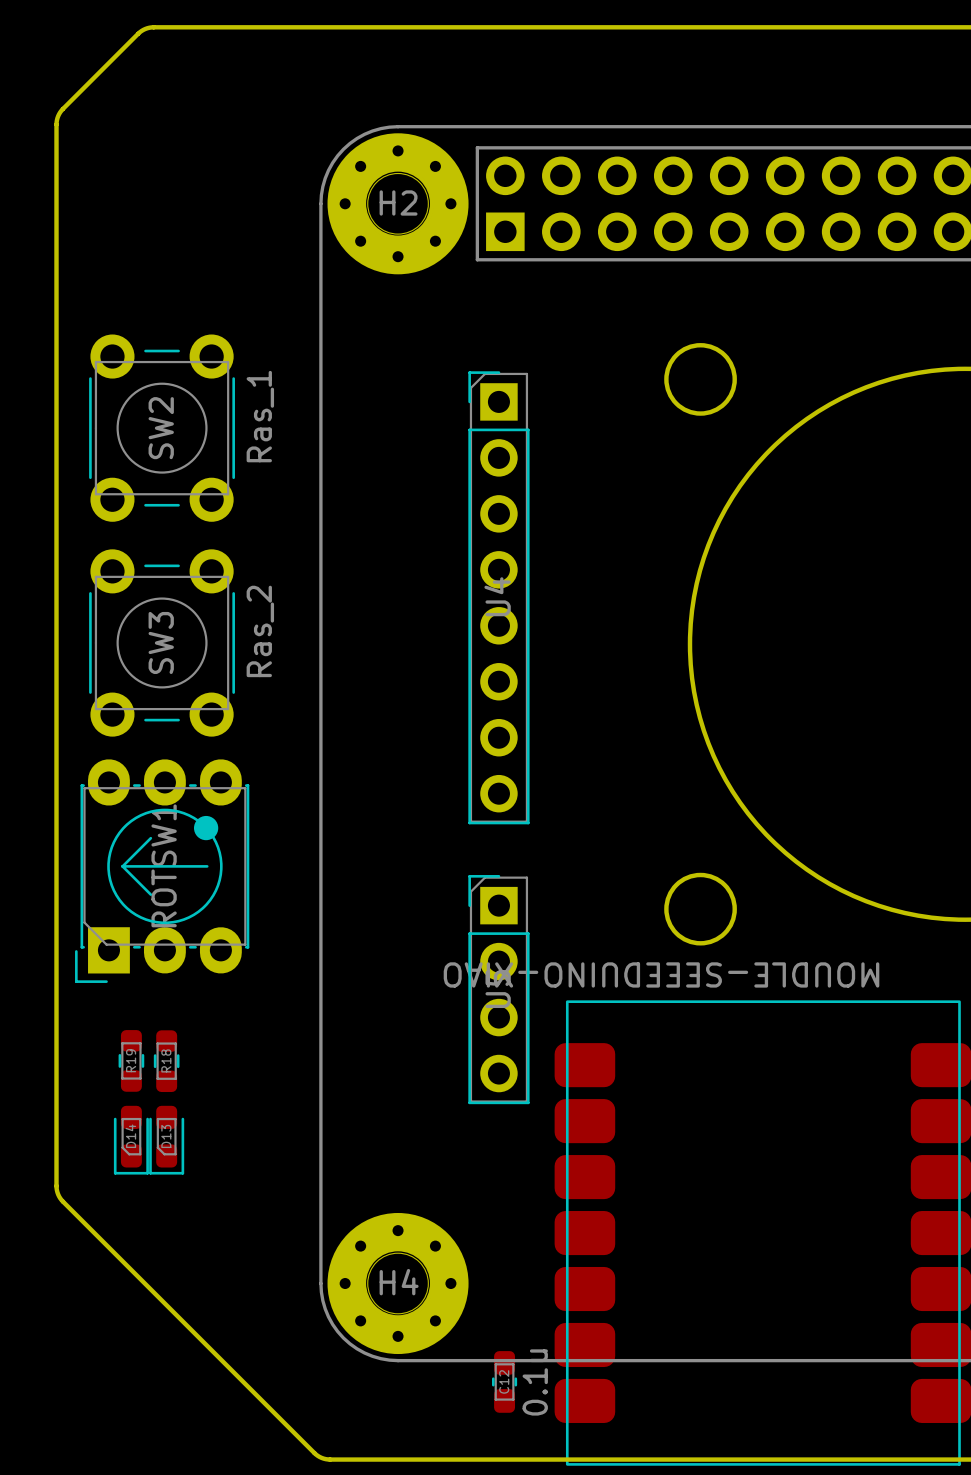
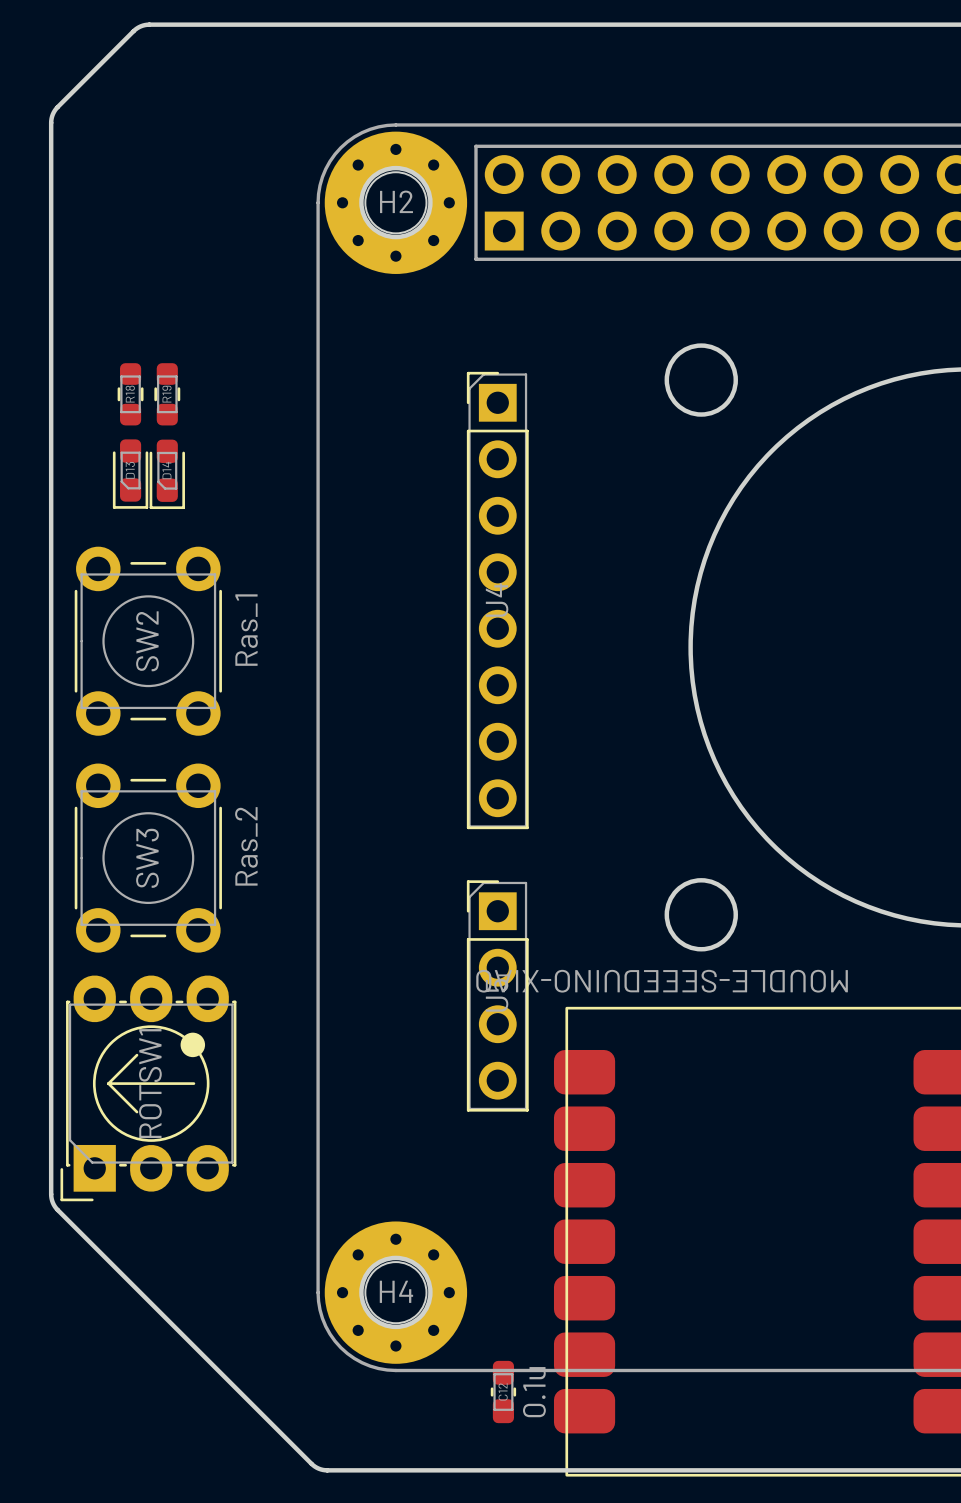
SW2 position: (162, 428) -> (148, 641)
SW3 position: (162, 642) -> (148, 858)
ROTSW1 footprint: [75, 759, 250, 983] -> [60, 975, 237, 1202]
drawing position: (206, 828) -> (192, 1044)
R19 position: (131, 1060) -> (167, 394)
R18 position: (166, 1061) -> (130, 394)
D14 position: (131, 1140) -> (167, 474)
D13 position: (166, 1140) -> (130, 474)

